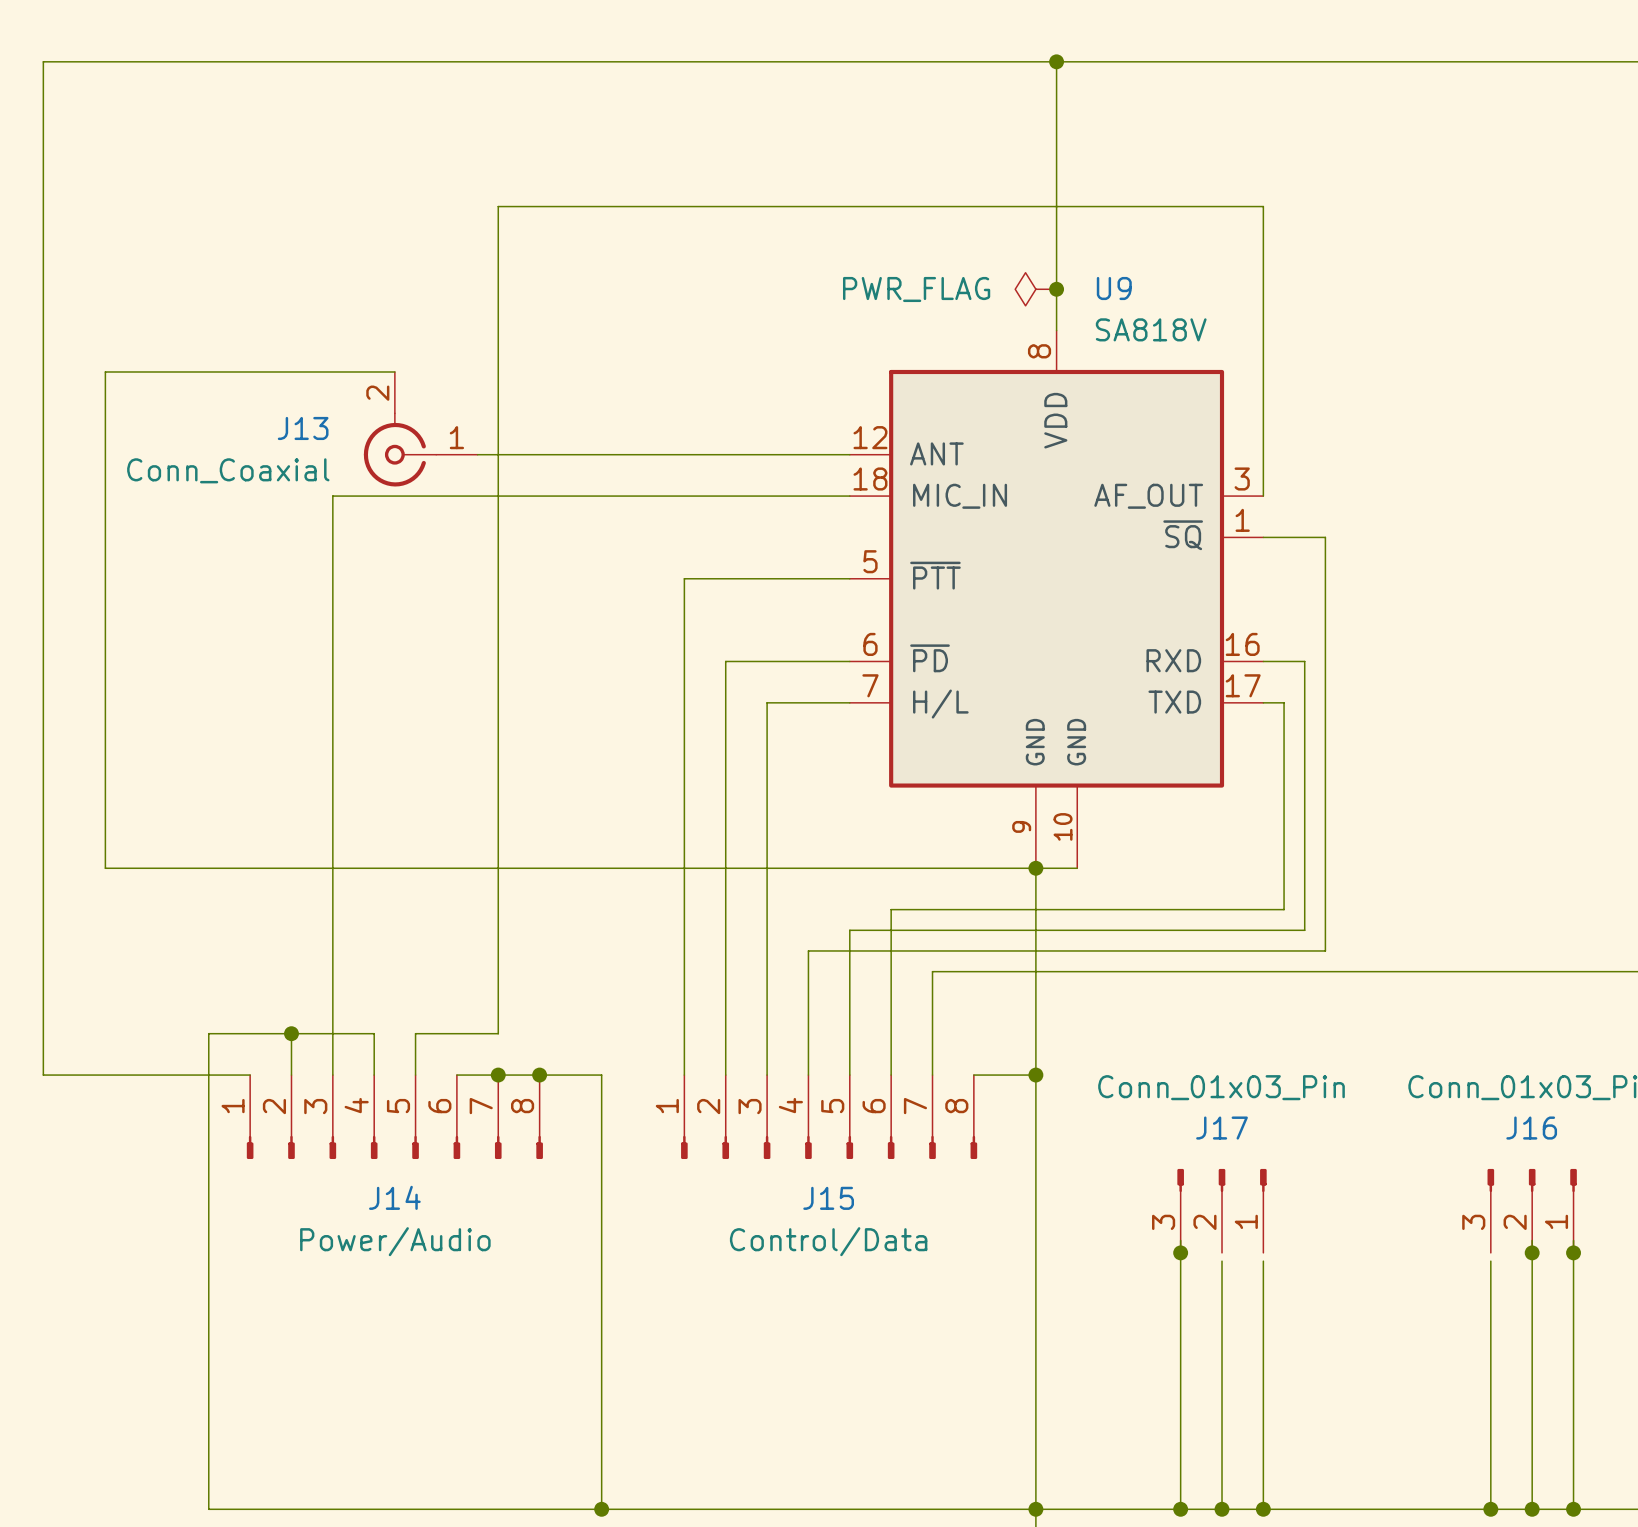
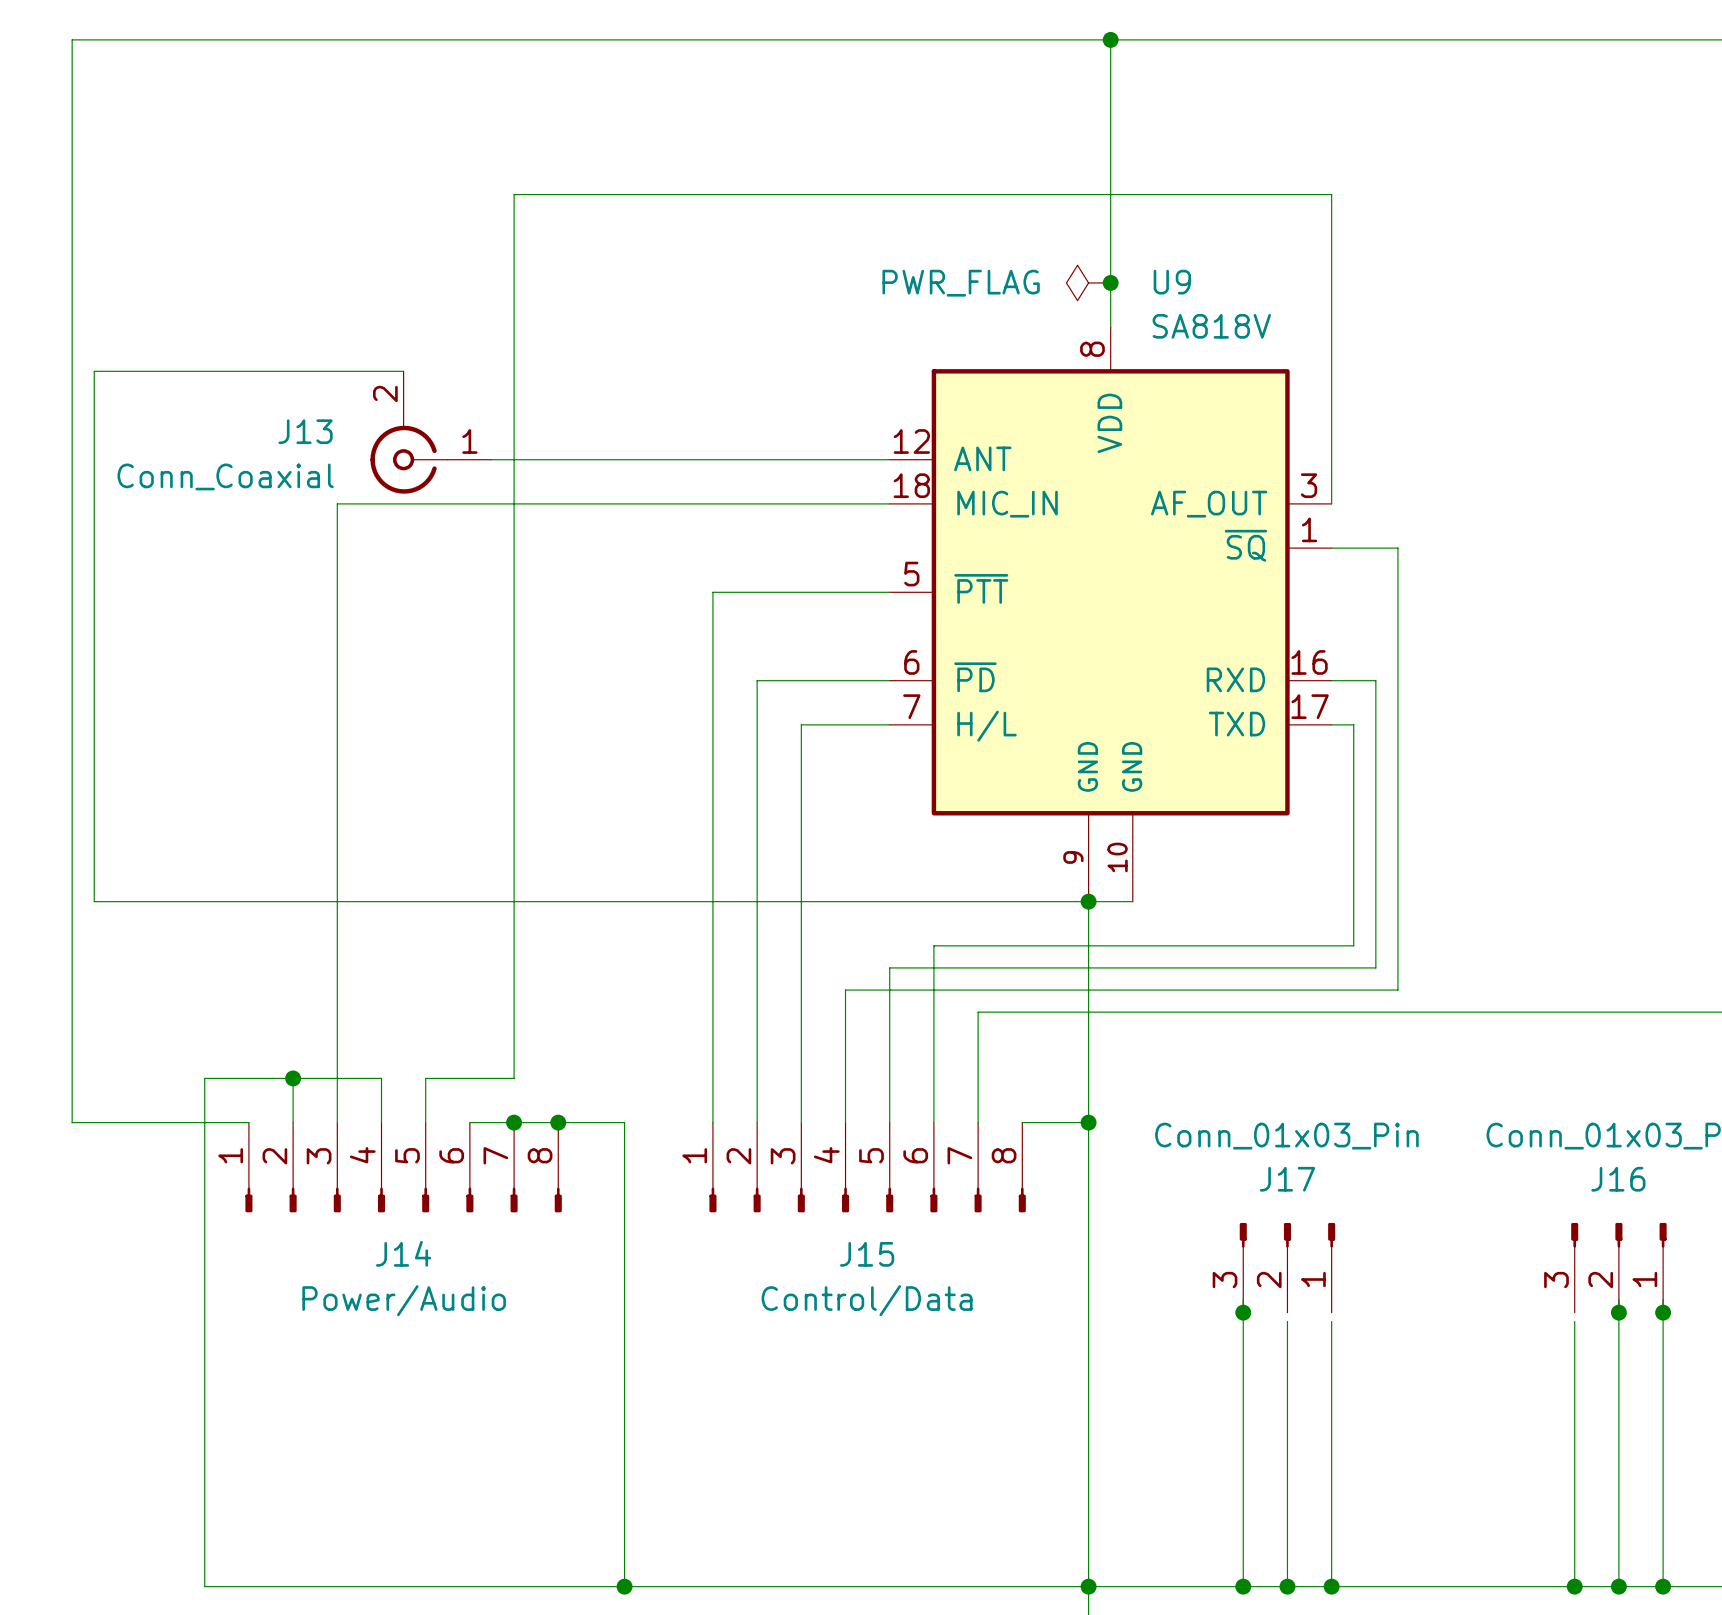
wire: (84, 61) (43, 61) (43, 1075) (84, 1075) -> (72, 39) (72, 1122)

